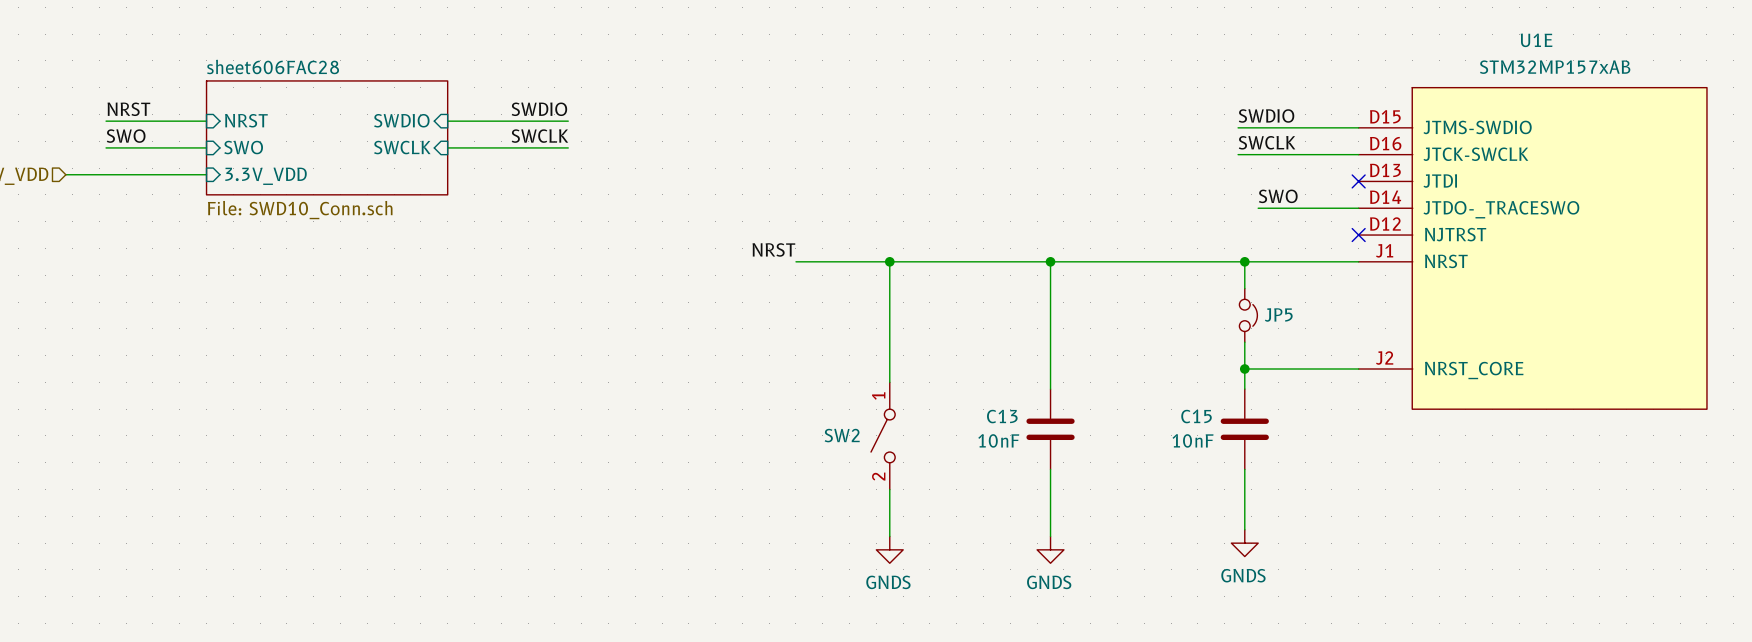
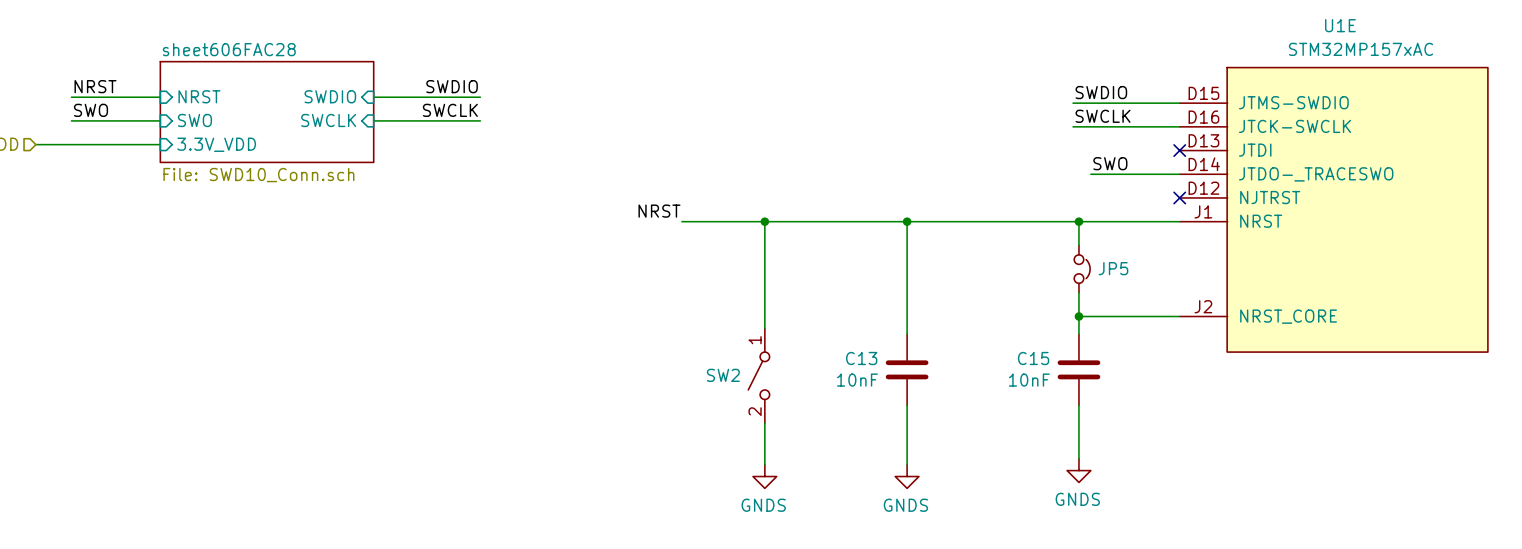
U1E value: STM32MP157xAB (1555, 67) -> STM32MP157xAC (1361, 49)

